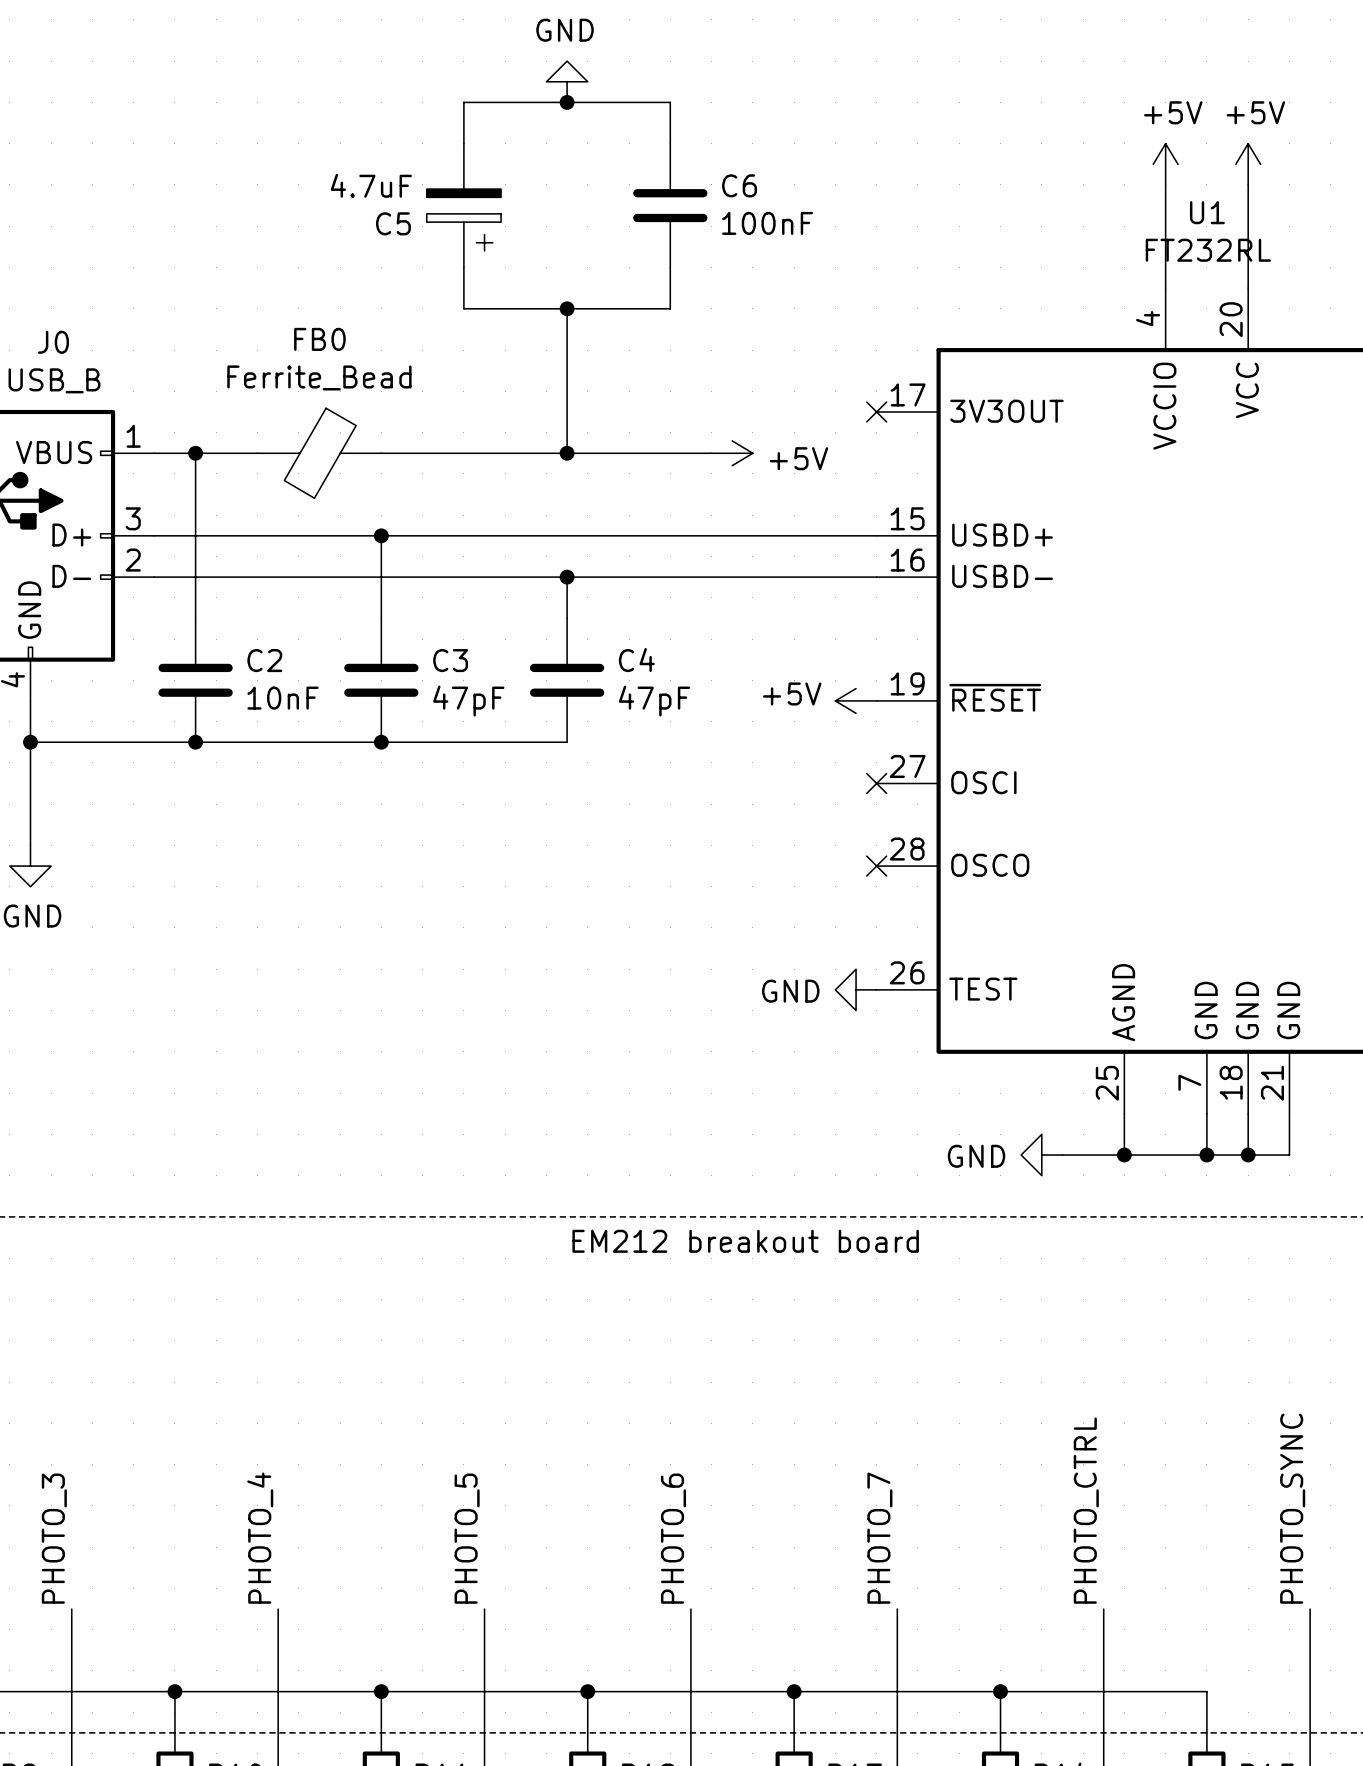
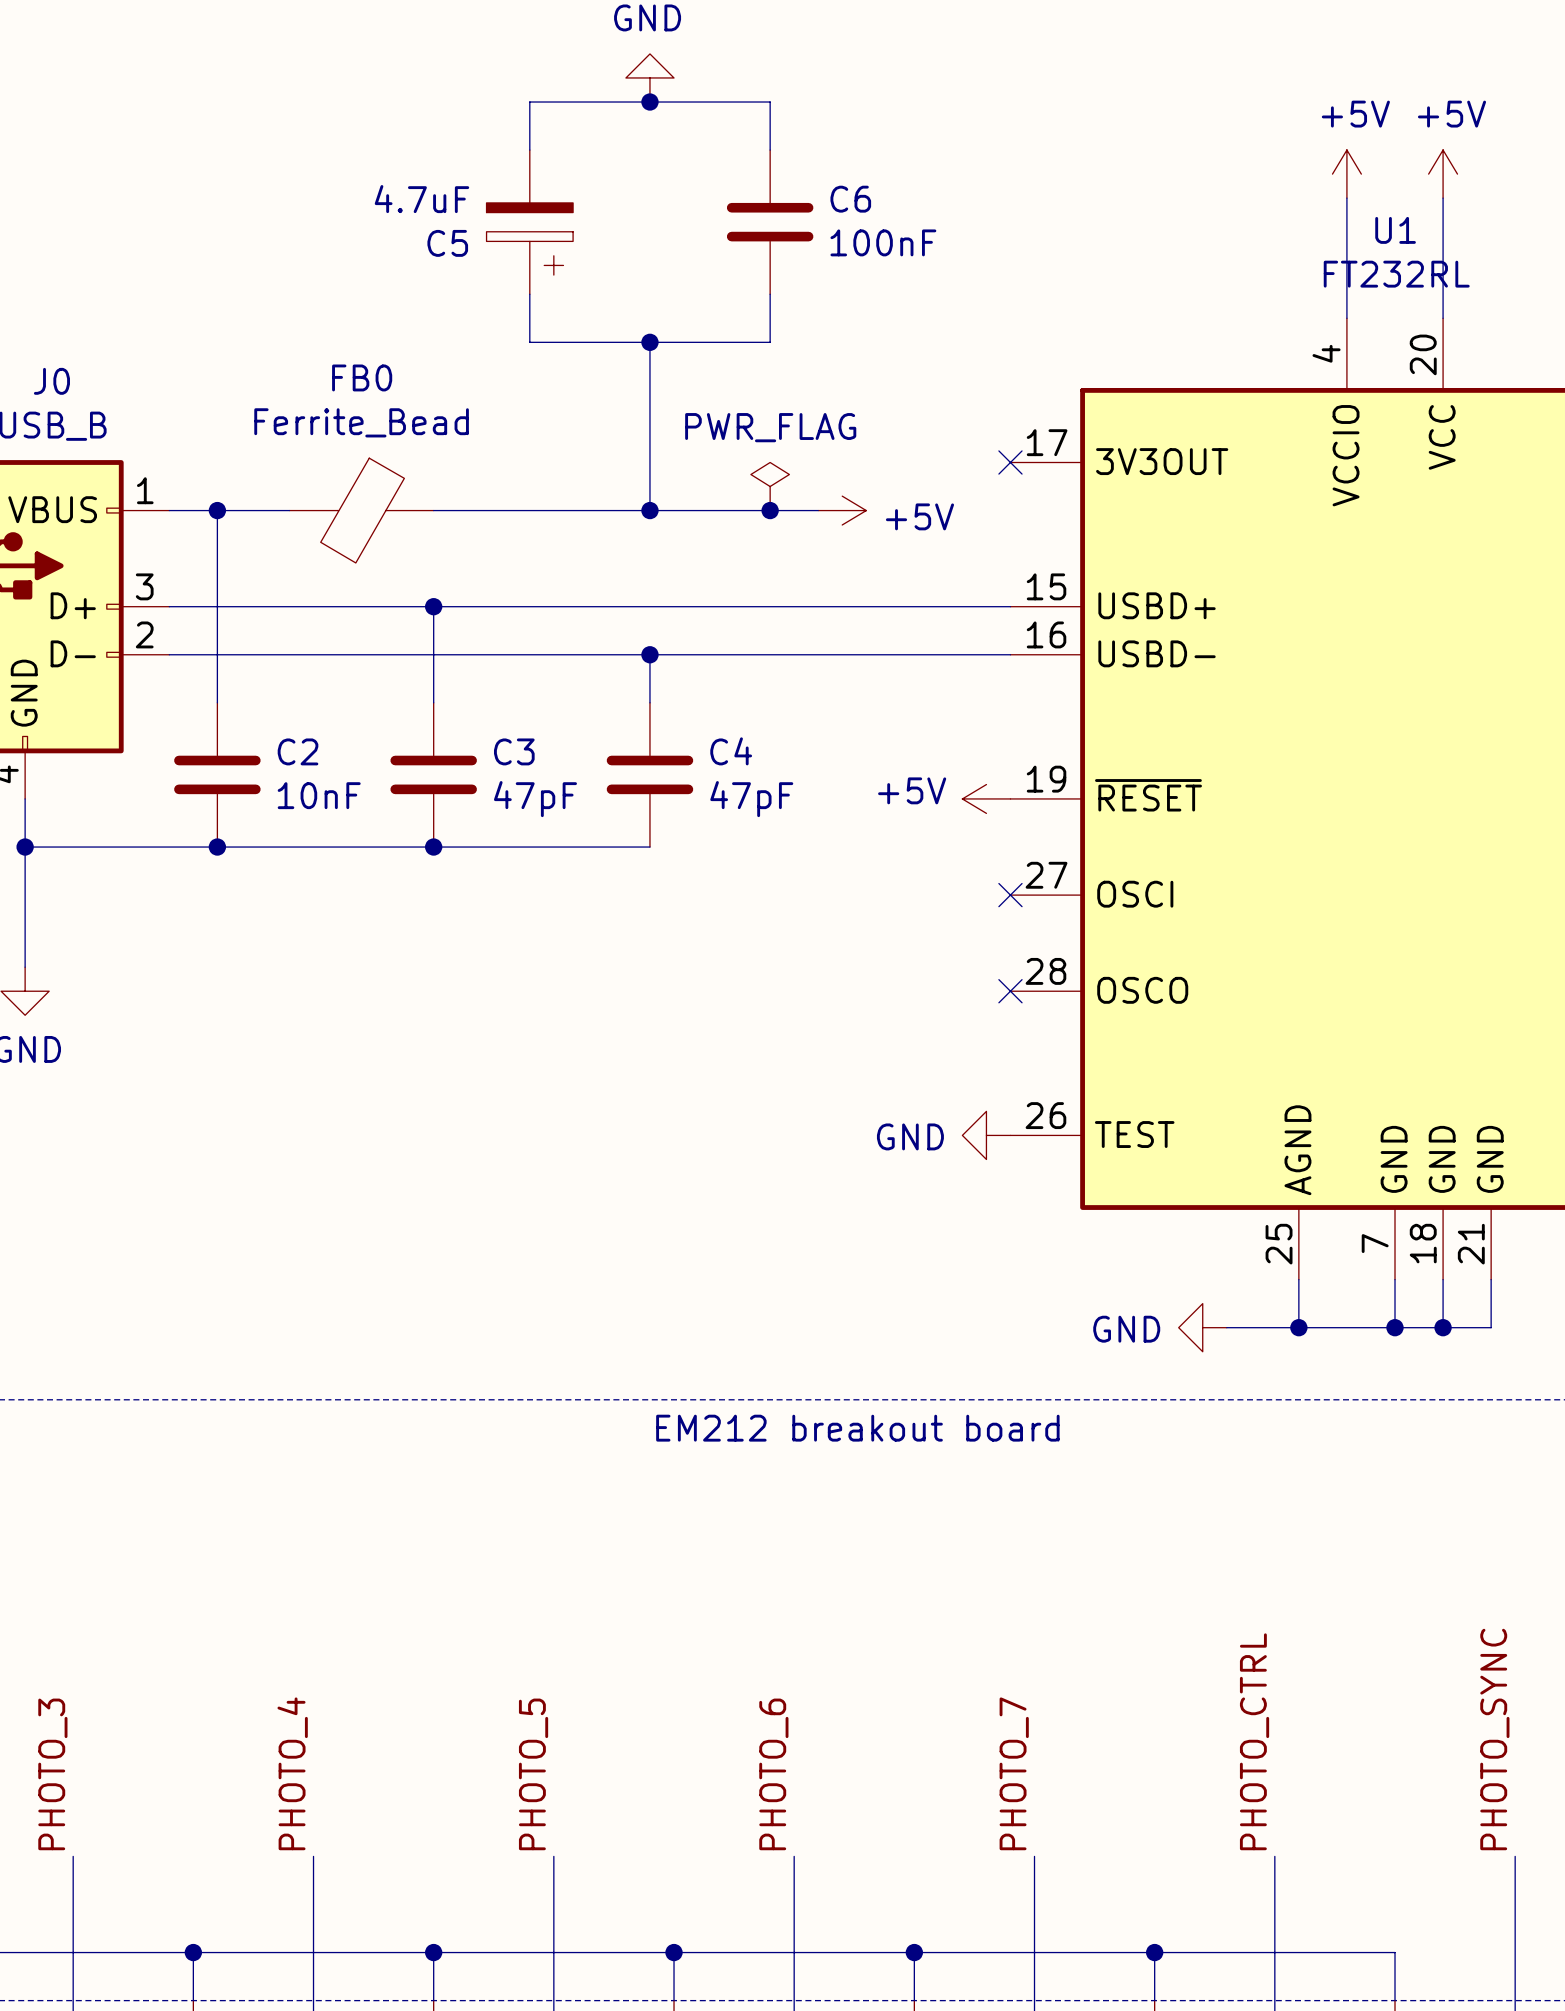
power symbol: none -> PWR_FLAG (770, 486)
junction: none -> (770, 510)

